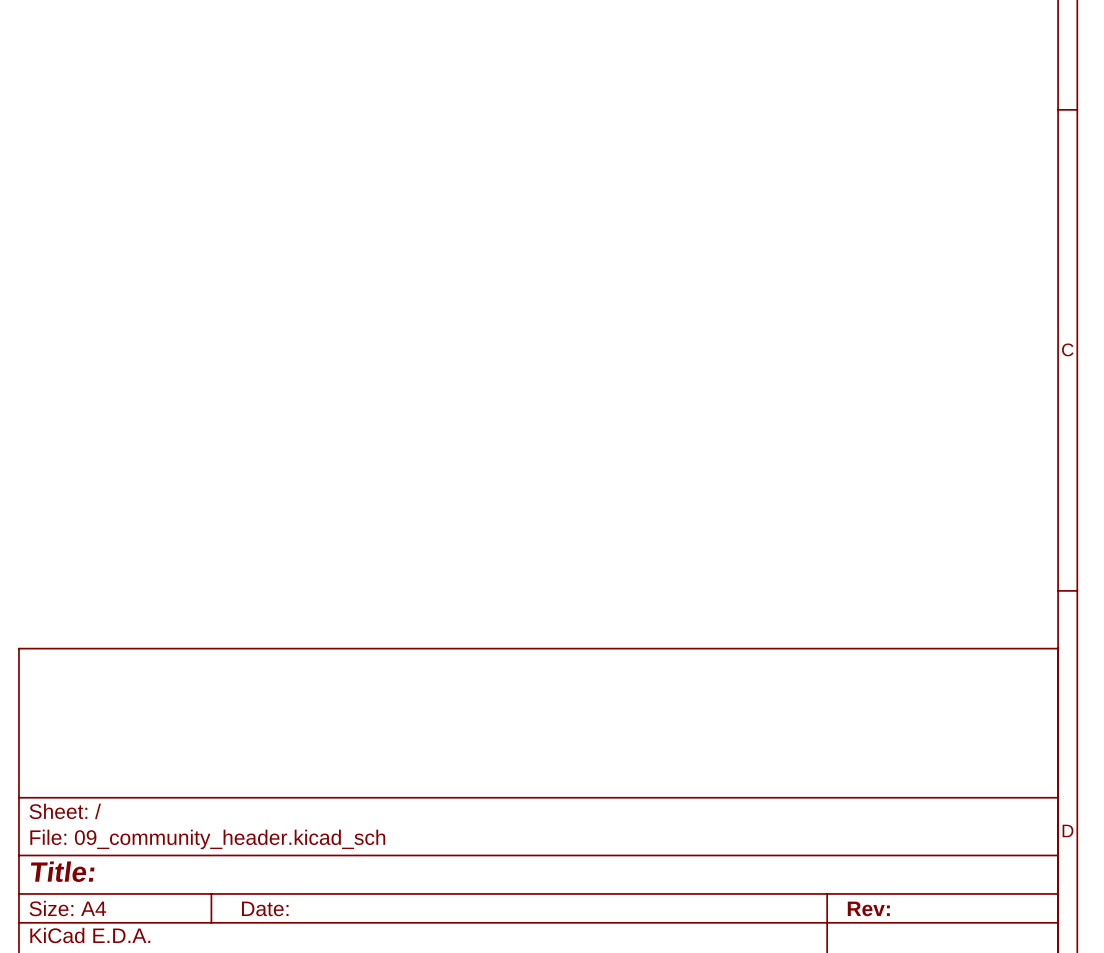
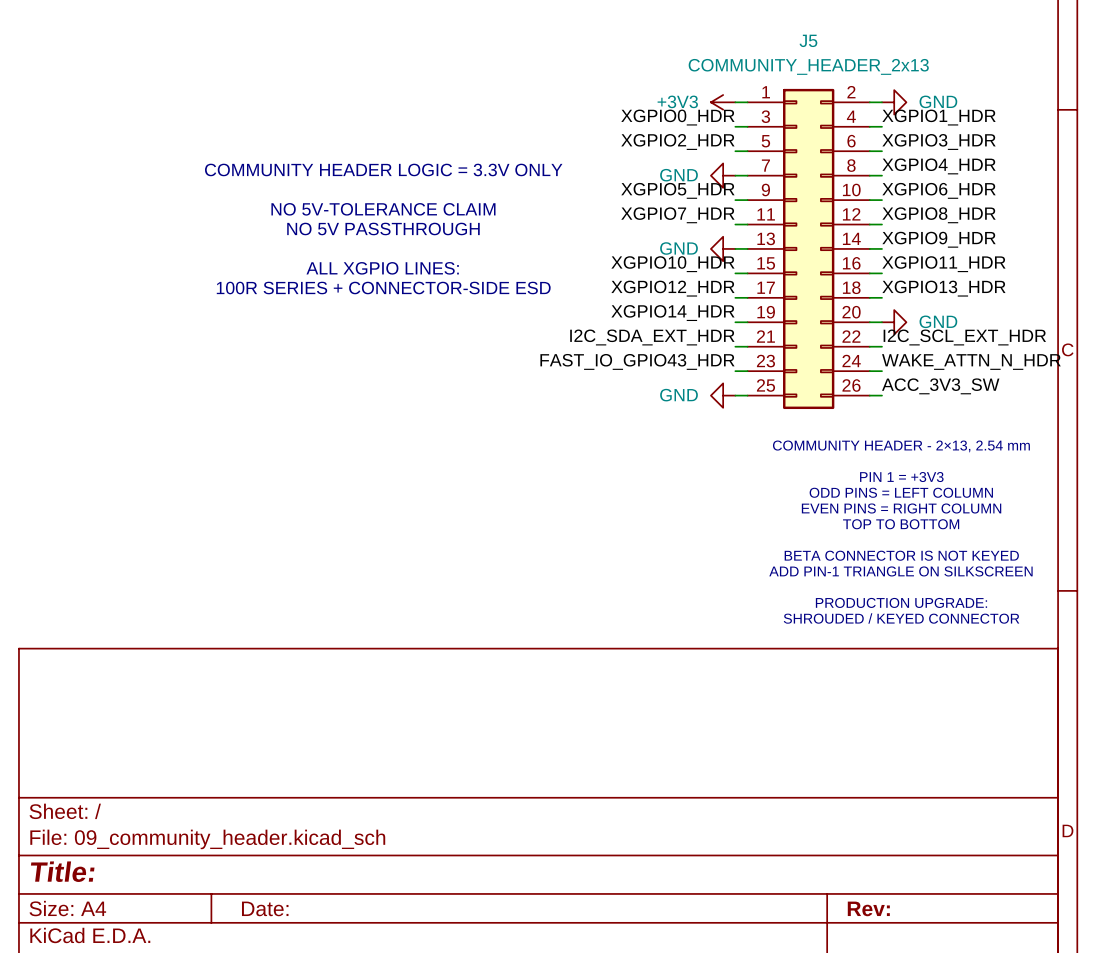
power symbol: none -> +3V3 (723, 102)
wire: none -> (735, 102) (747, 102)
wire: none -> (869, 102) (881, 102)
power symbol: none -> GND (894, 102)
label: none -> XGPIO0_HDR (677, 117)
label: none -> XGPIO1_HDR (939, 117)
wire: none -> (735, 126) (747, 126)
wire: none -> (869, 126) (881, 126)
label: none -> XGPIO2_HDR (677, 141)
label: none -> XGPIO3_HDR (939, 141)
wire: none -> (735, 151) (747, 151)
wire: none -> (869, 151) (881, 151)
label: none -> XGPIO4_HDR (939, 166)
text: none -> COMMUNITY HEADER LOGIC = 3.3V ONLY (383, 169)
power symbol: none -> GND (723, 175)
wire: none -> (735, 175) (747, 175)
wire: none -> (869, 175) (881, 175)
label: none -> XGPIO5_HDR (677, 190)
label: none -> XGPIO6_HDR (939, 190)
wire: none -> (735, 200) (747, 200)
wire: none -> (869, 200) (881, 200)
text: none -> NO 5V-TOLERANCE CLAIM (383, 209)
label: none -> XGPIO7_HDR (677, 215)
label: none -> XGPIO8_HDR (939, 215)
wire: none -> (735, 224) (747, 224)
wire: none -> (869, 224) (881, 224)
text: none -> NO 5V PASSTHROUGH (383, 228)
label: none -> XGPIO9_HDR (939, 239)
power symbol: none -> GND (723, 248)
wire: none -> (735, 248) (747, 248)
J5: none -> COMMUNITY_HEADER_2x13 (808, 248)
wire: none -> (869, 248) (881, 248)
label: none -> XGPIO10_HDR (672, 264)
label: none -> XGPIO11_HDR (943, 264)
text: none -> ALL XGPIO LINES: (382, 268)
wire: none -> (735, 273) (747, 273)
wire: none -> (869, 273) (881, 273)
text: none -> 100R SERIES + CONNECTOR-SIDE ESD (383, 288)
label: none -> XGPIO12_HDR (672, 288)
label: none -> XGPIO13_HDR (943, 288)
wire: none -> (735, 297) (747, 297)
wire: none -> (869, 297) (881, 297)
label: none -> XGPIO14_HDR (672, 313)
wire: none -> (735, 322) (747, 322)
wire: none -> (869, 322) (881, 322)
power symbol: none -> GND (894, 322)
label: none -> I2C_SDA_EXT_HDR (652, 337)
label: none -> I2C_SCL_EXT_HDR (964, 337)
wire: none -> (735, 346) (747, 346)
wire: none -> (869, 346) (881, 346)
label: none -> FAST_IO_GPIO43_HDR (637, 361)
label: none -> WAKE_ATTN_N_HDR (971, 362)
wire: none -> (735, 371) (747, 371)
wire: none -> (869, 371) (881, 371)
label: none -> ACC_3V3_SW (940, 386)
power symbol: none -> GND (723, 395)
wire: none -> (735, 395) (747, 395)
wire: none -> (869, 395) (881, 395)
text: none -> COMMUNITY HEADER - 2×13, 2.54 mm (901, 446)
text: none -> PIN 1 = +3V3 (901, 477)
text: none -> ODD PINS = LEFT COLUMN (901, 492)
text: none -> EVEN PINS = RIGHT COLUMN (901, 508)
text: none -> TOP TO BOTTOM (901, 524)
text: none -> BETA CONNECTOR IS NOT KEYED (901, 555)
text: none -> ADD PIN-1 TRIANGLE ON SILKSCREEN (900, 571)
text: none -> PRODUCTION UPGRADE: (901, 602)
text: none -> SHROUDED / KEYED CONNECTOR (901, 618)

